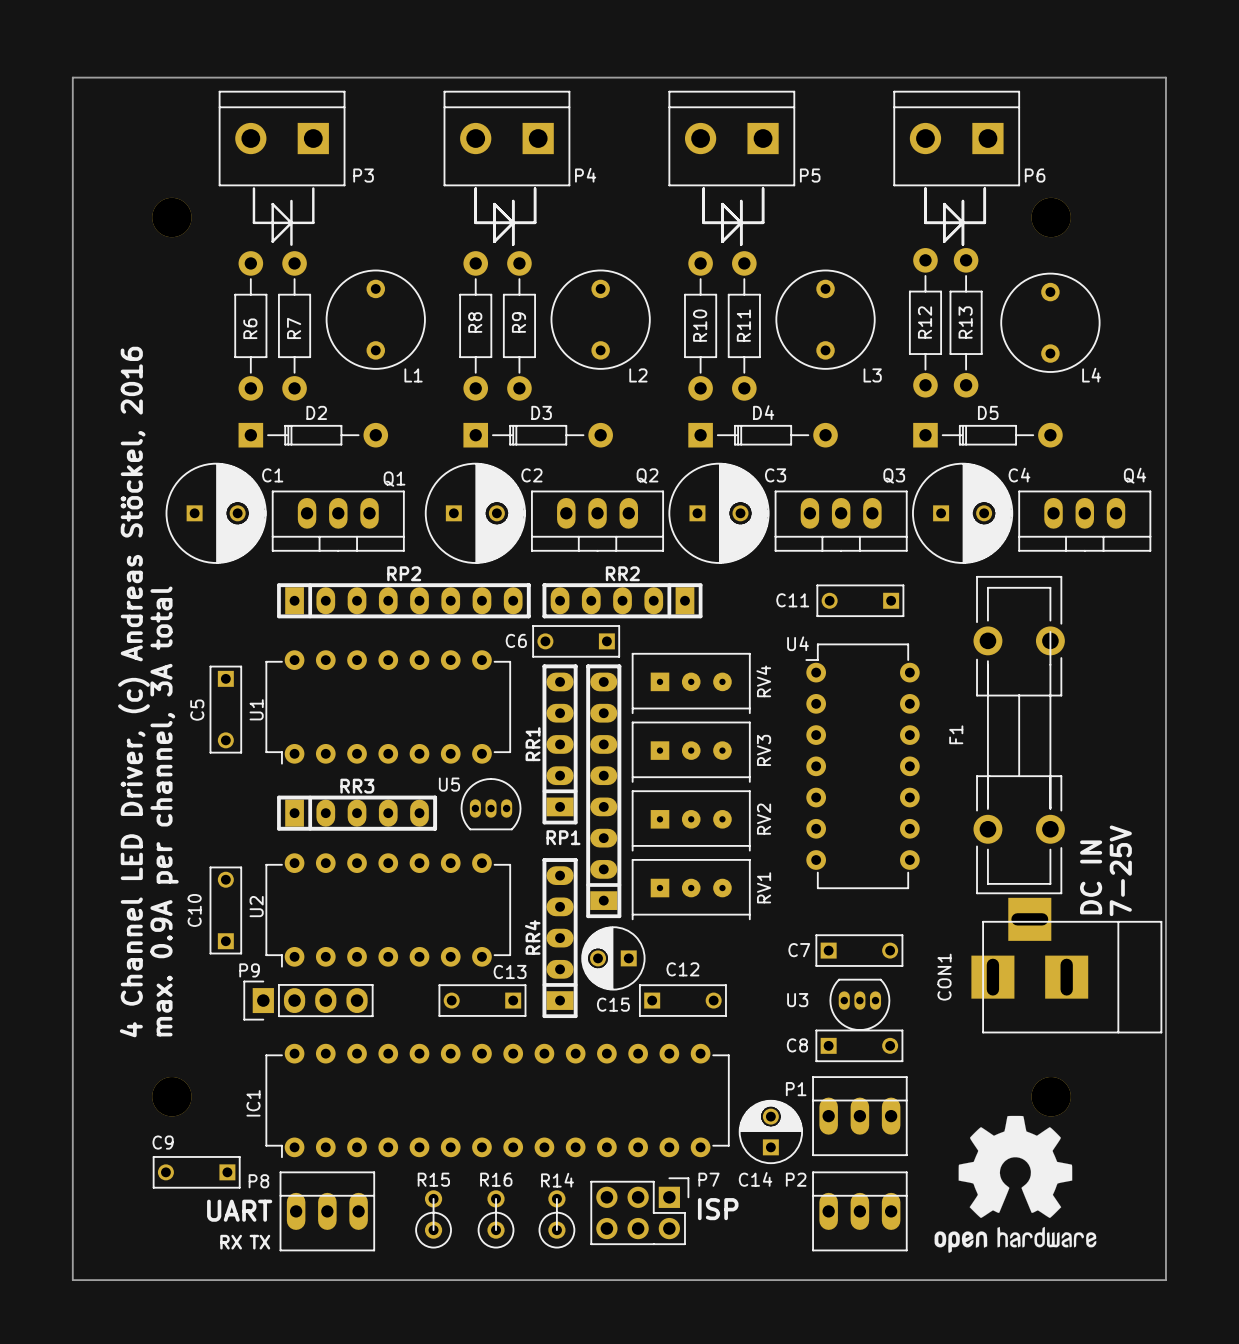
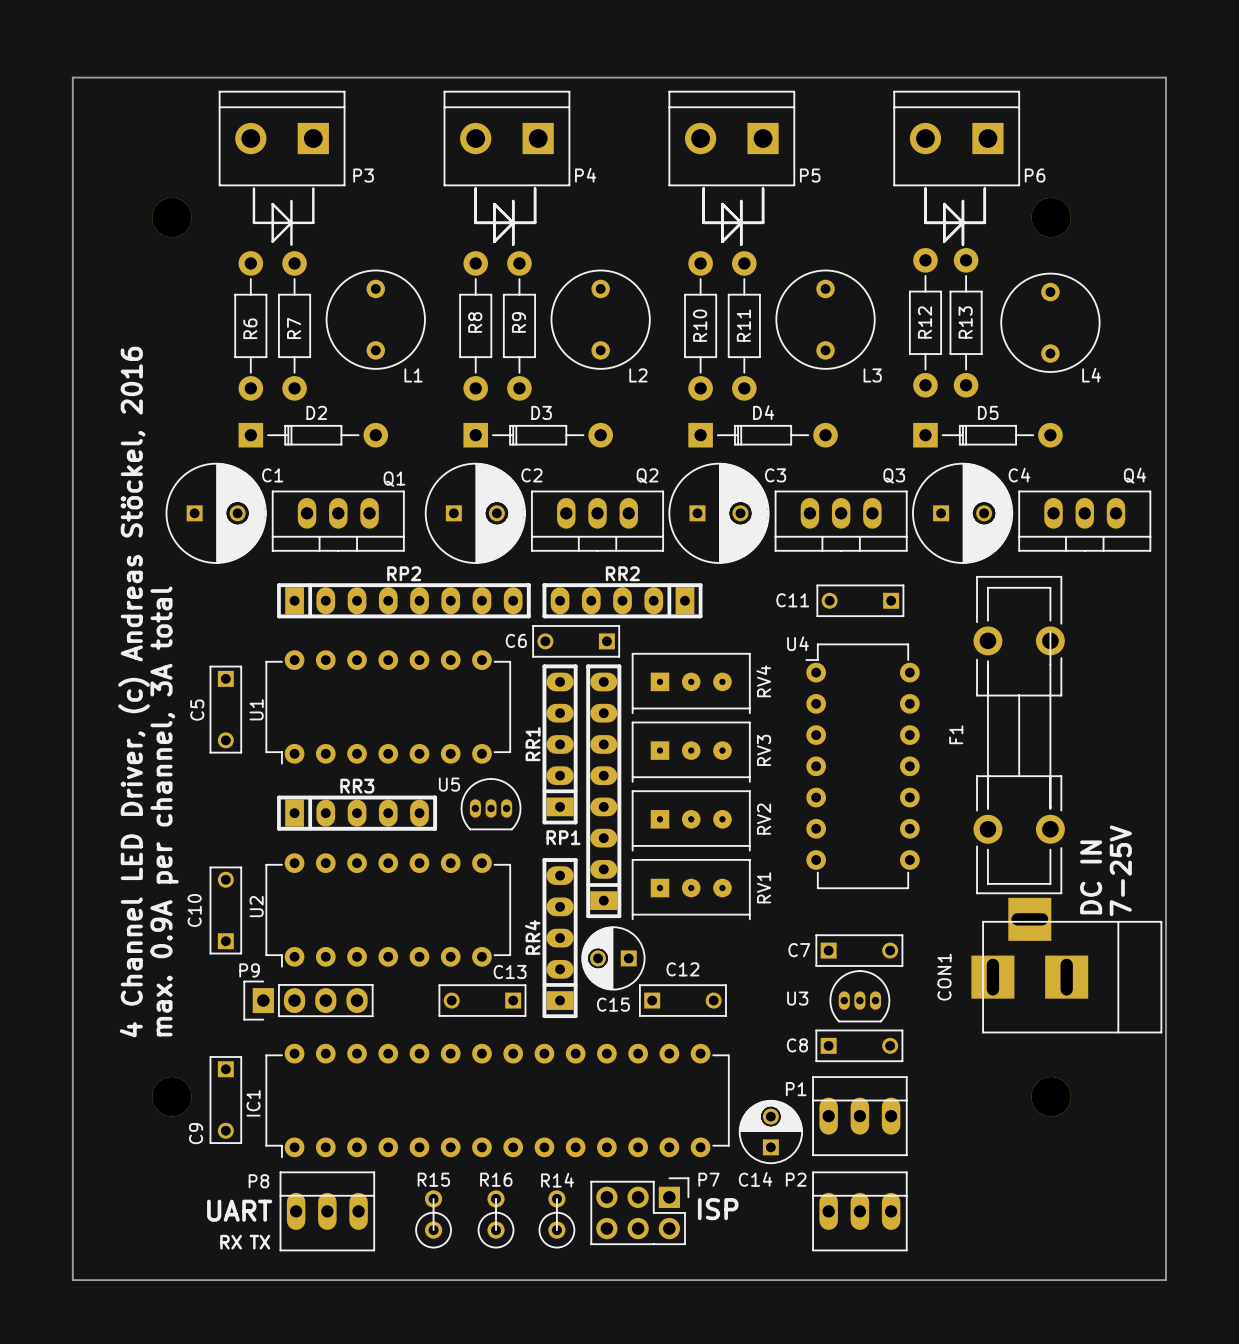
U3 rotation: 0° (859, 1004) -> 180° (859, 996)
drawing: [934, 1115, 1097, 1253] -> none
C9 rotation: 0° (196, 1172) -> 90° counterclockwise (225, 1100)
C9 position: (196, 1172) -> (225, 1100)

